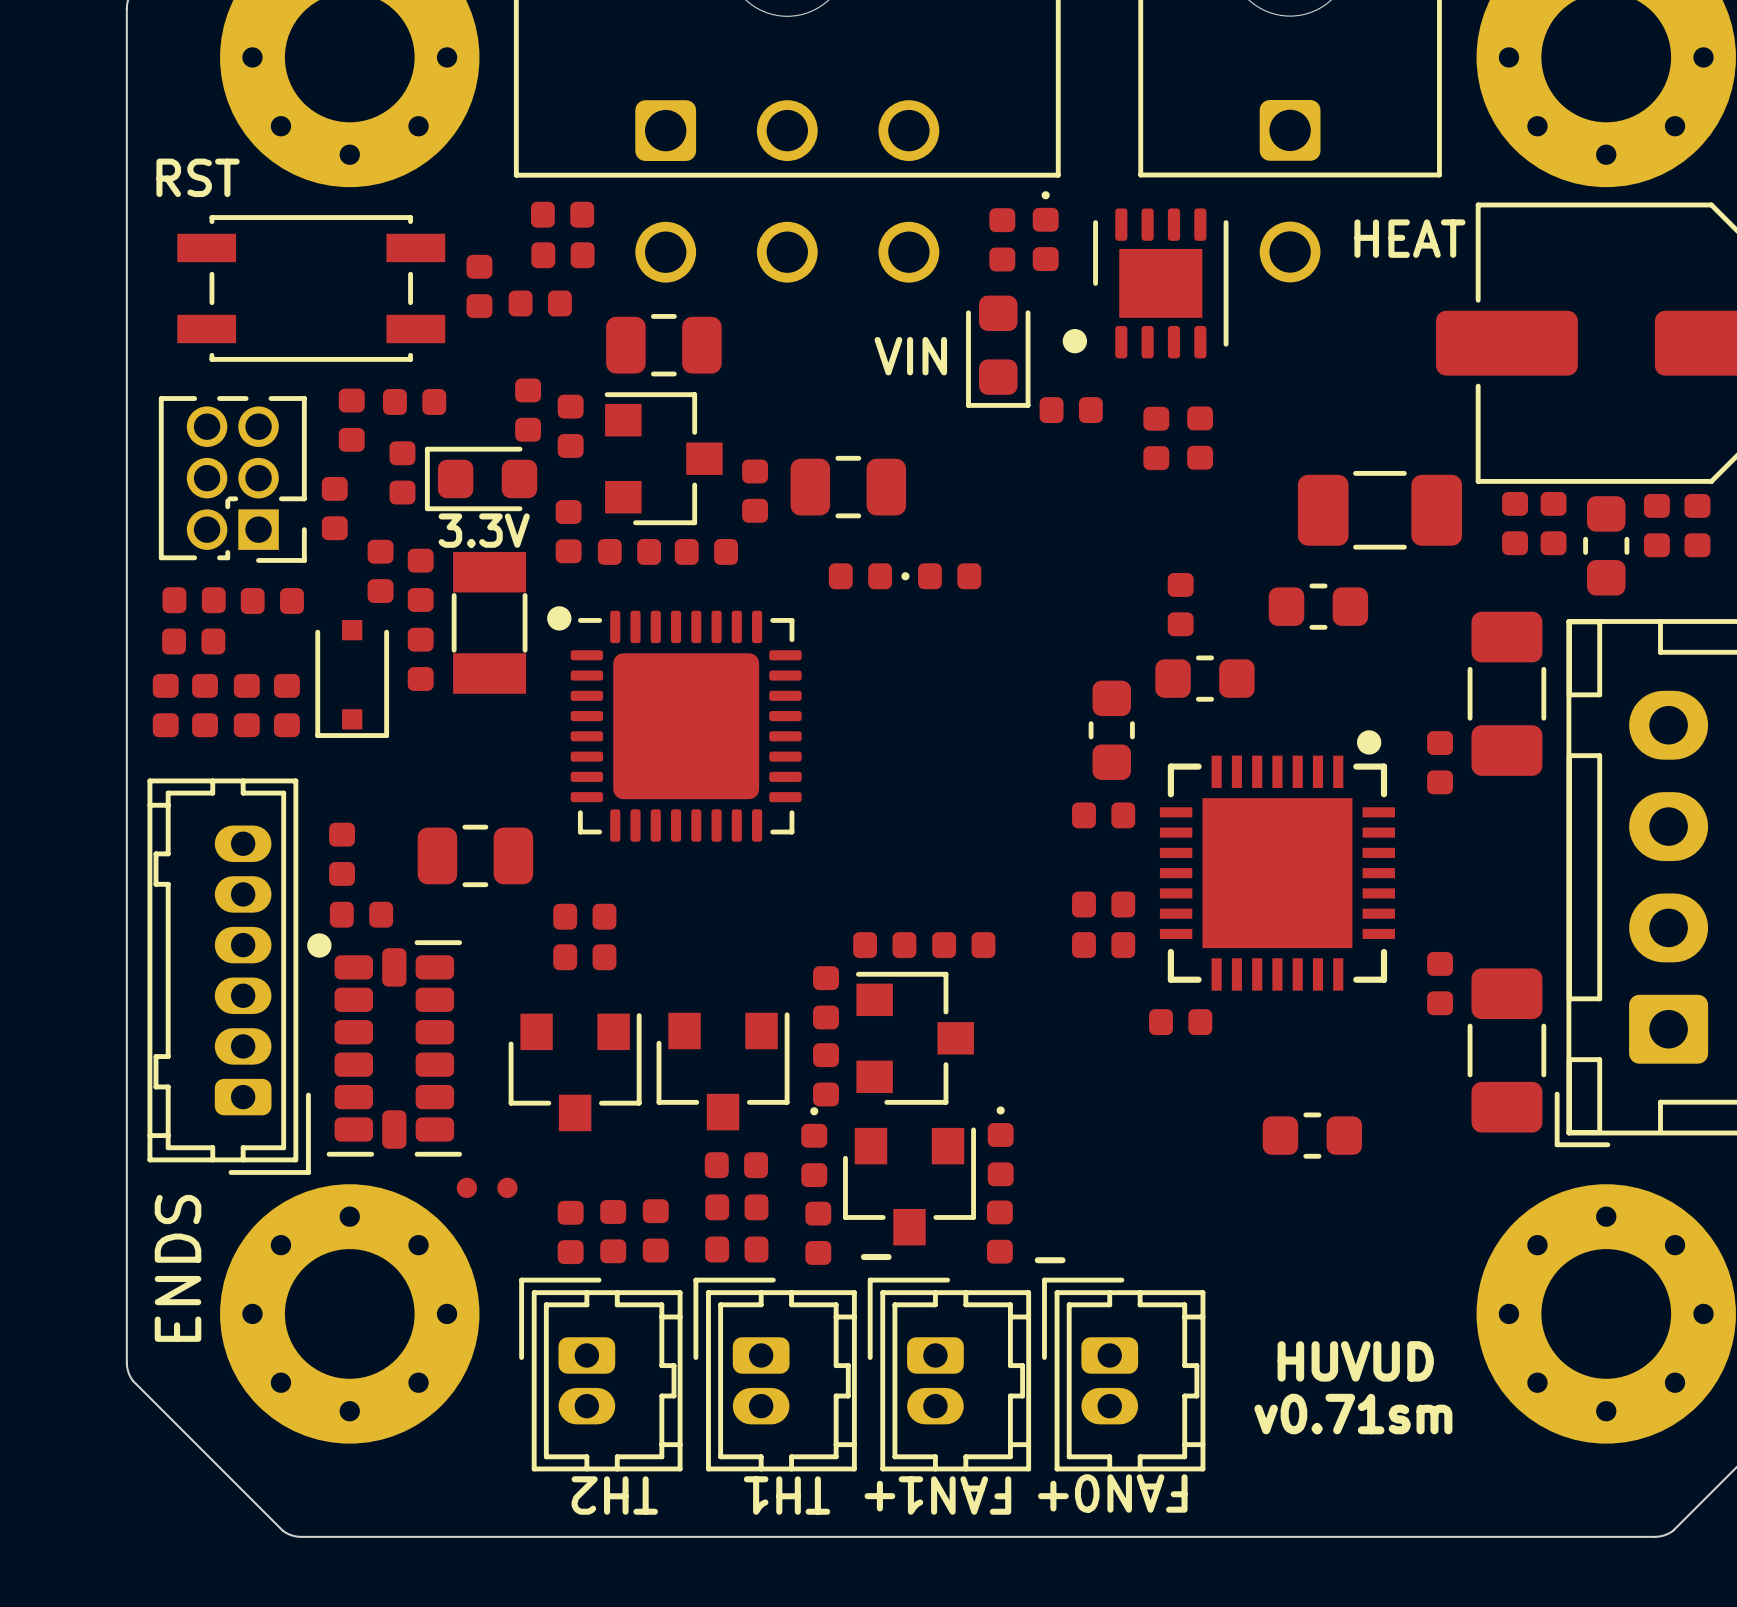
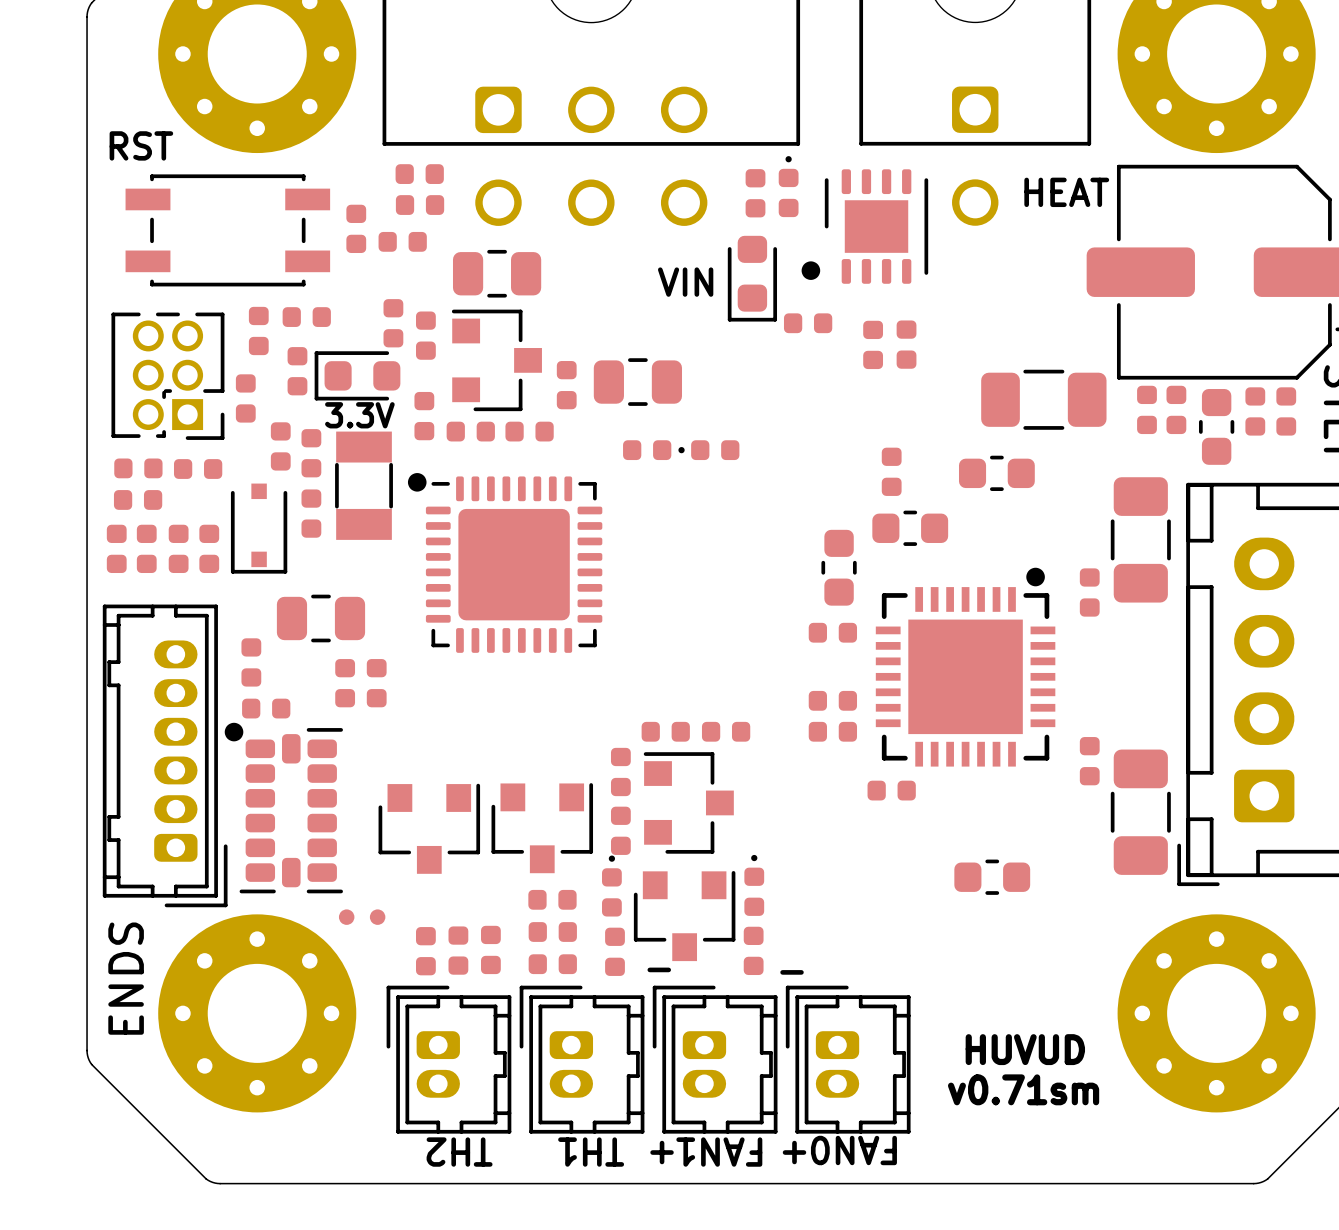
part position: (475, 855) -> (320, 618)
part: none -> (345, 683)
part: none -> (376, 683)
part: (584, 916) -> none
part: (584, 957) -> none

